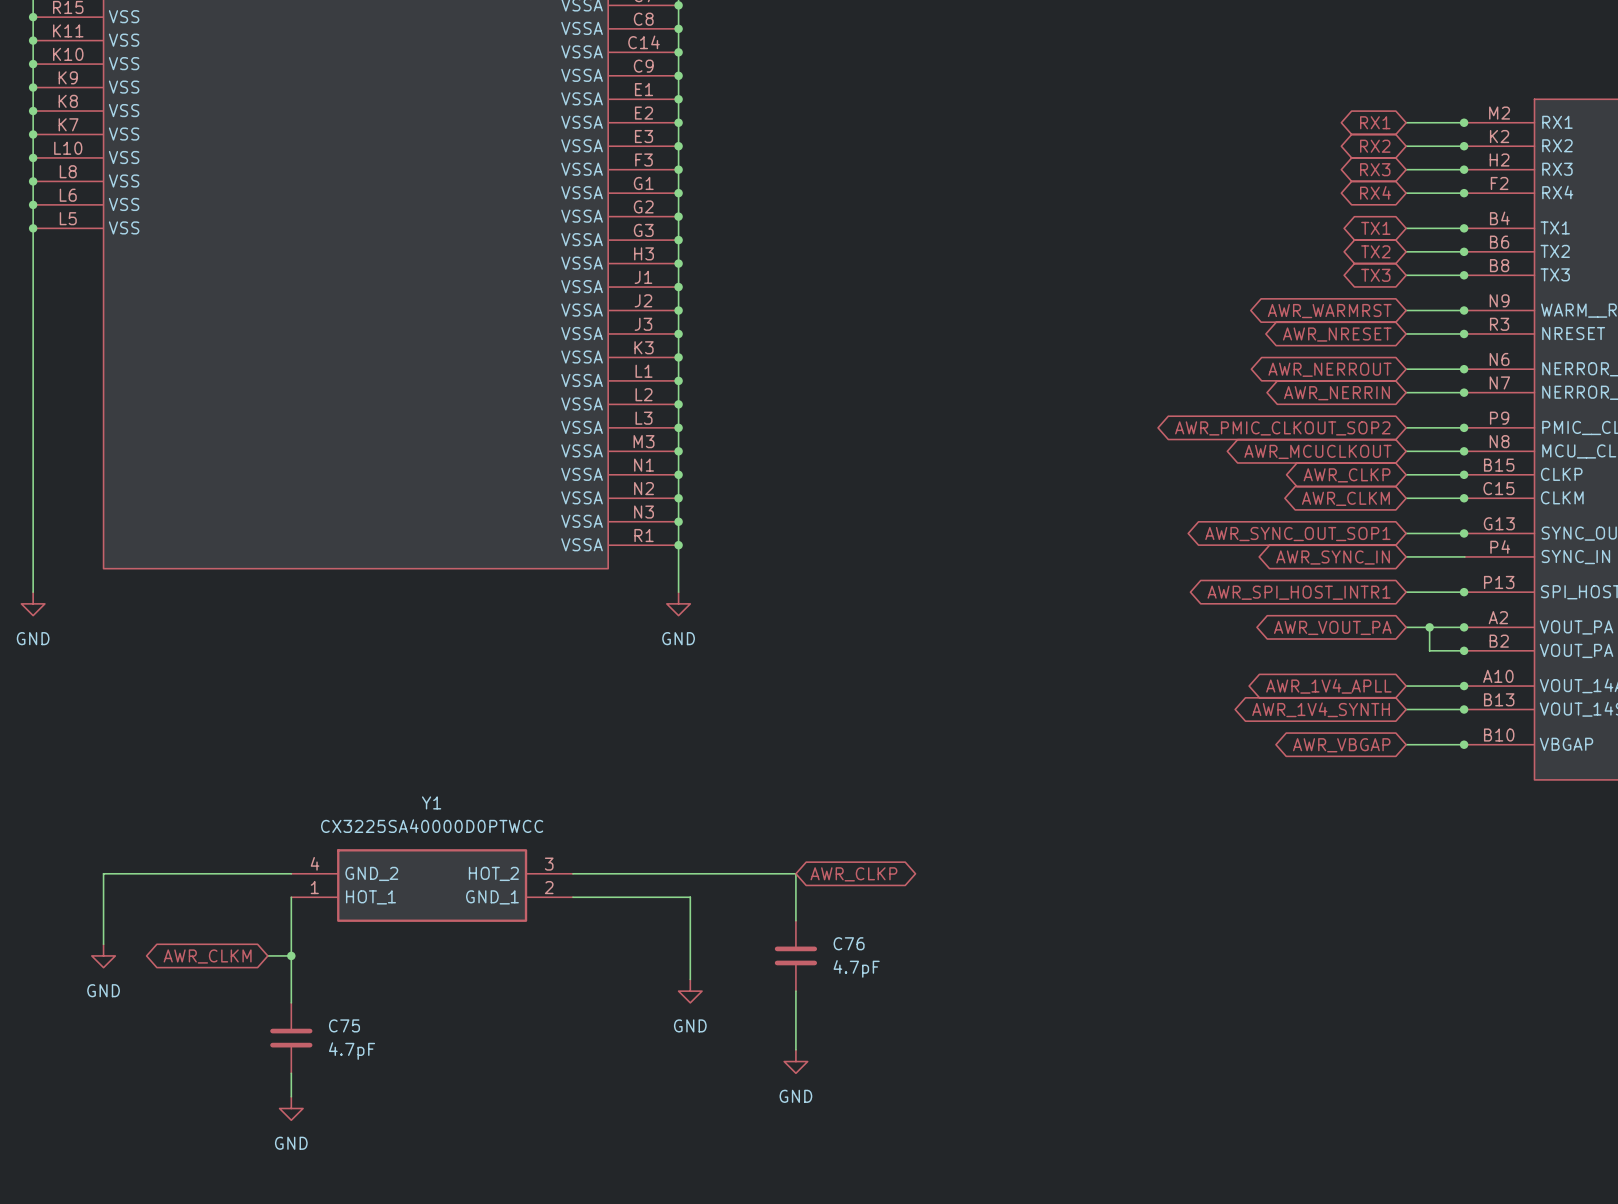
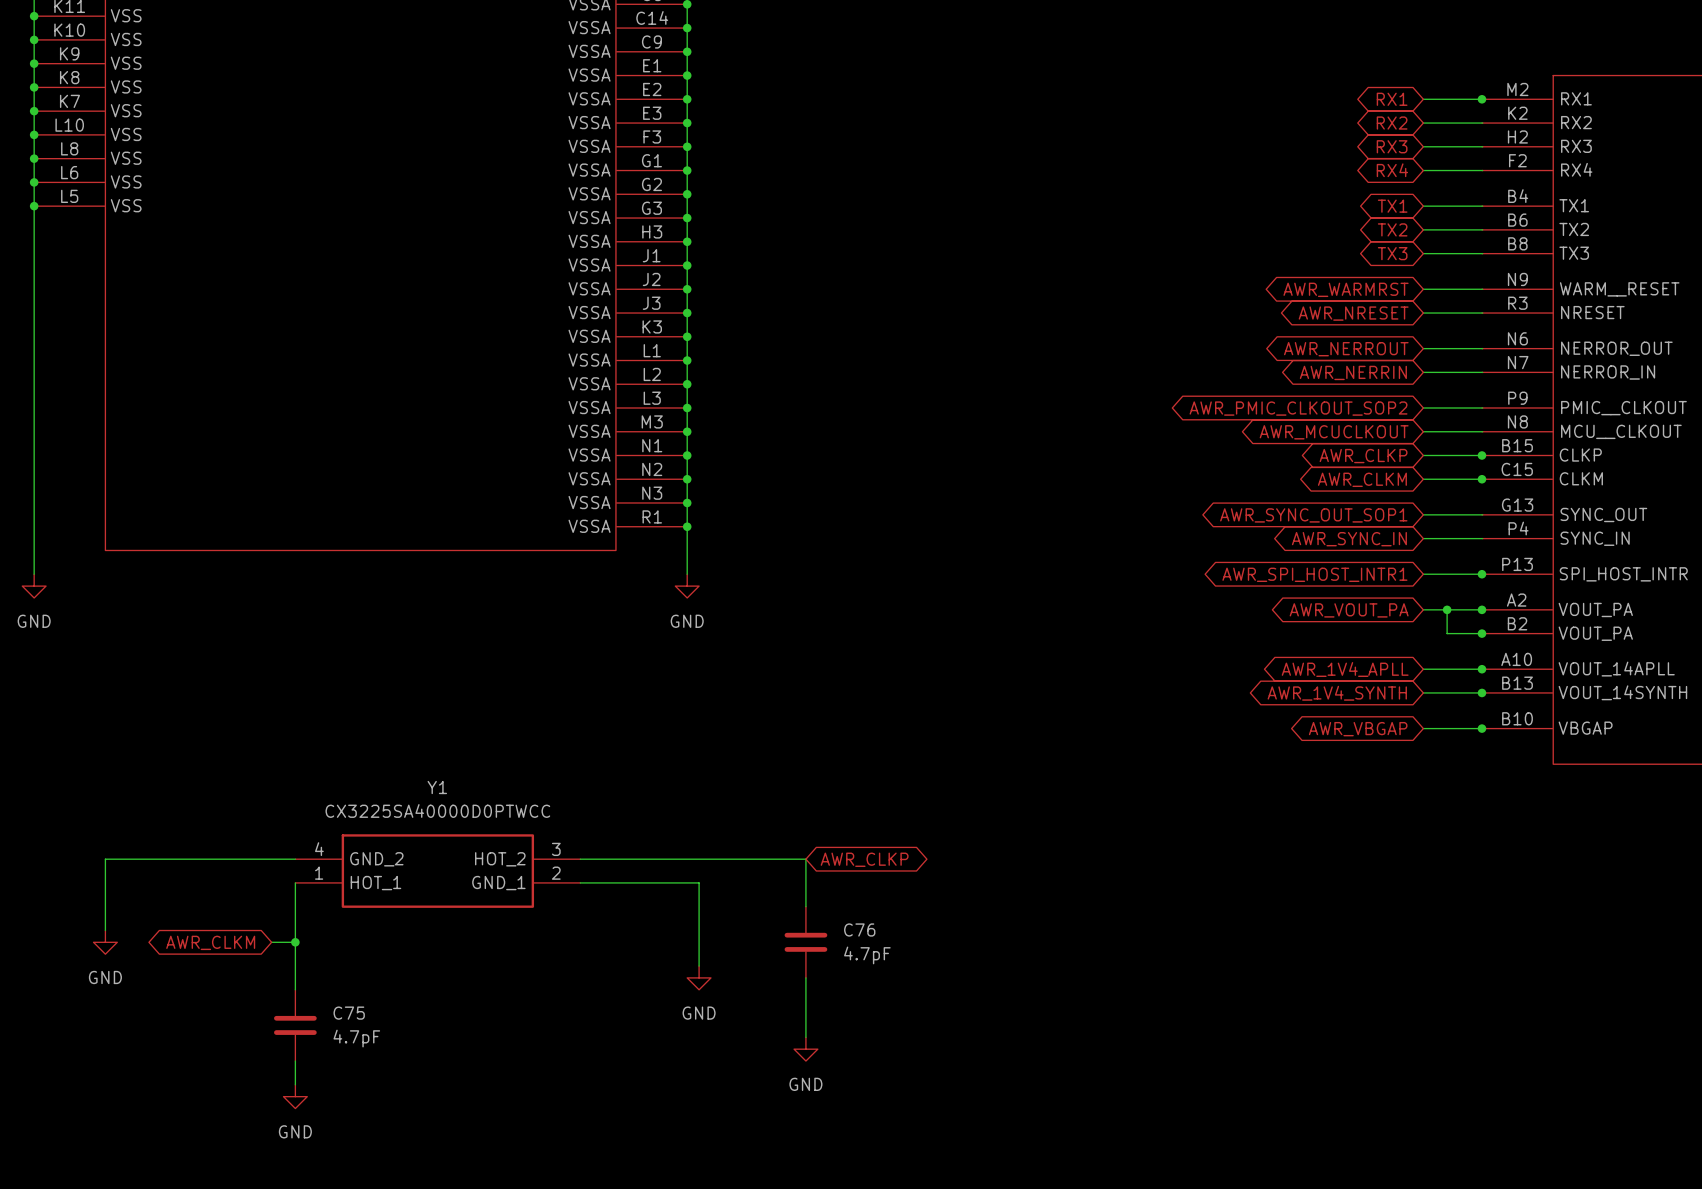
junction: (1464, 146) -> none
junction: (1464, 169) -> none
junction: (1464, 193) -> none
junction: (1464, 228) -> none
junction: (1464, 251) -> none
junction: (1464, 275) -> none
junction: (1464, 310) -> none
junction: (1464, 333) -> none
junction: (1464, 369) -> none
junction: (1464, 392) -> none
junction: (1464, 427) -> none
junction: (1464, 451) -> none
junction: (1464, 533) -> none

